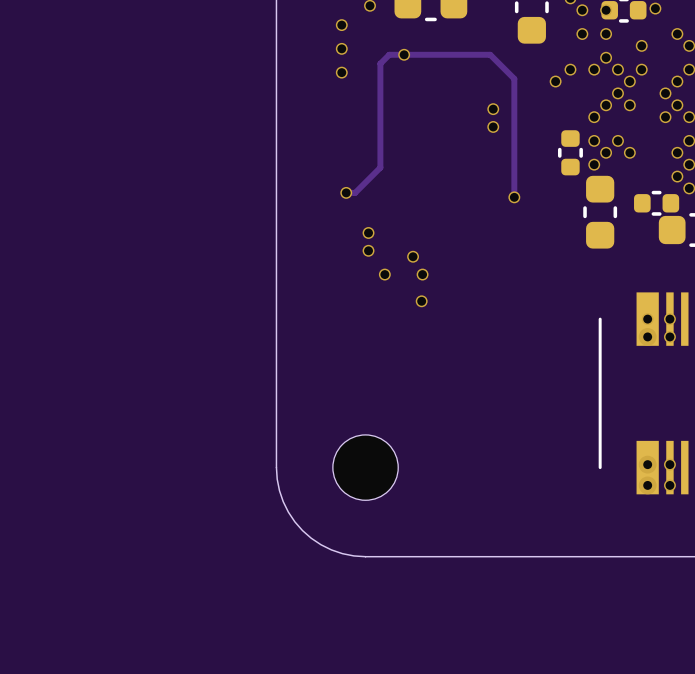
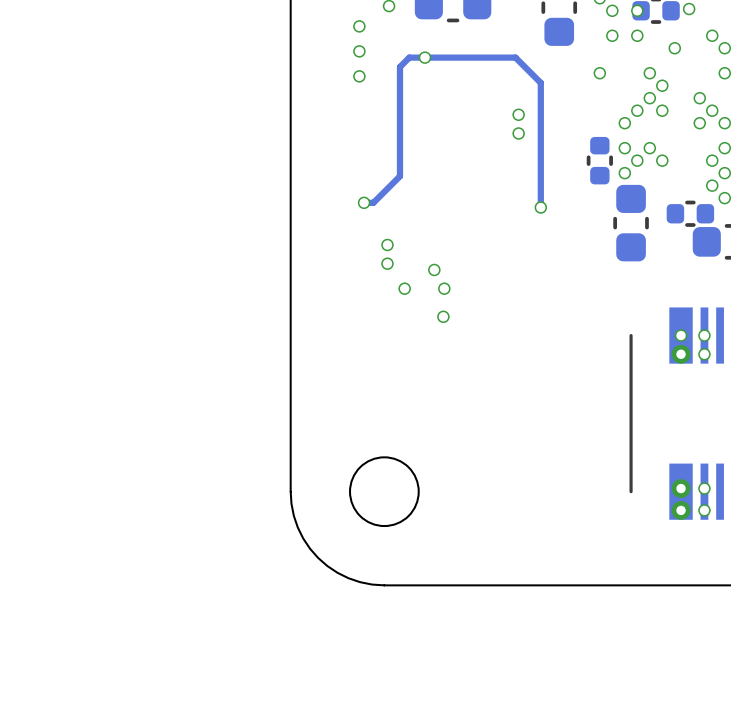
via: (606, 57) -> none
via: (594, 69) -> none
via: (641, 69) -> none
via: (555, 81) -> none
via: (677, 81) -> none

